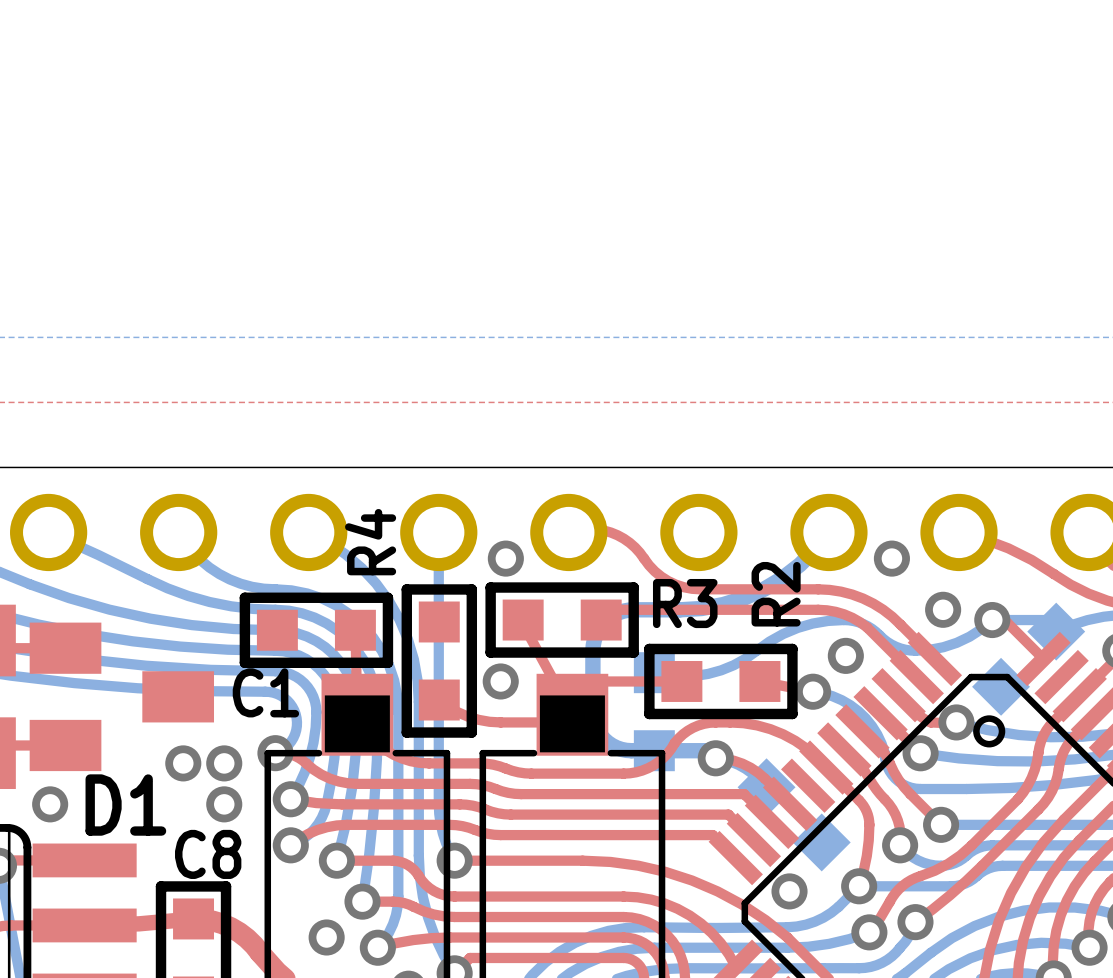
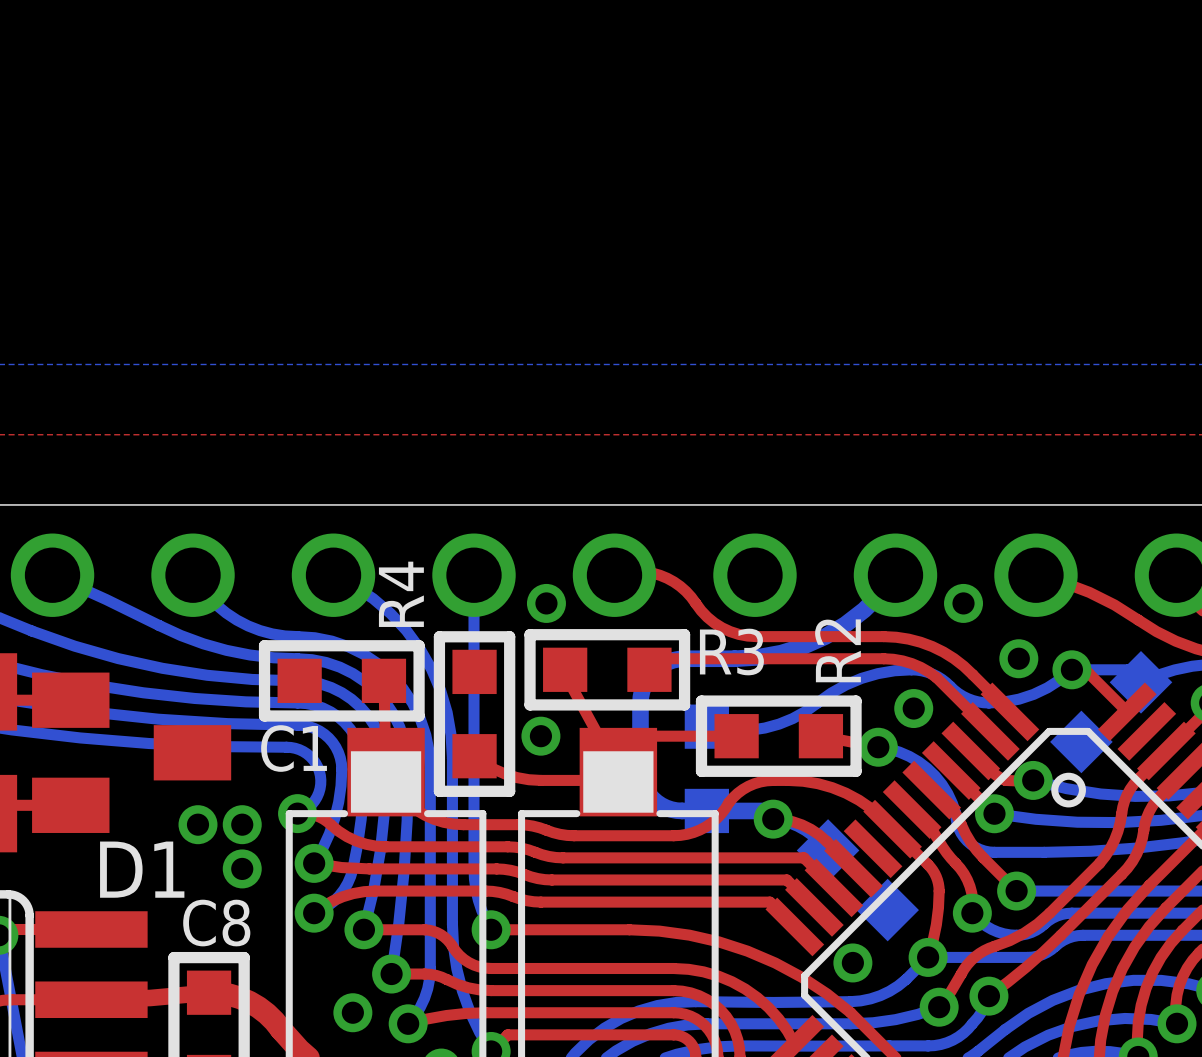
via: (50, 804) -> none

